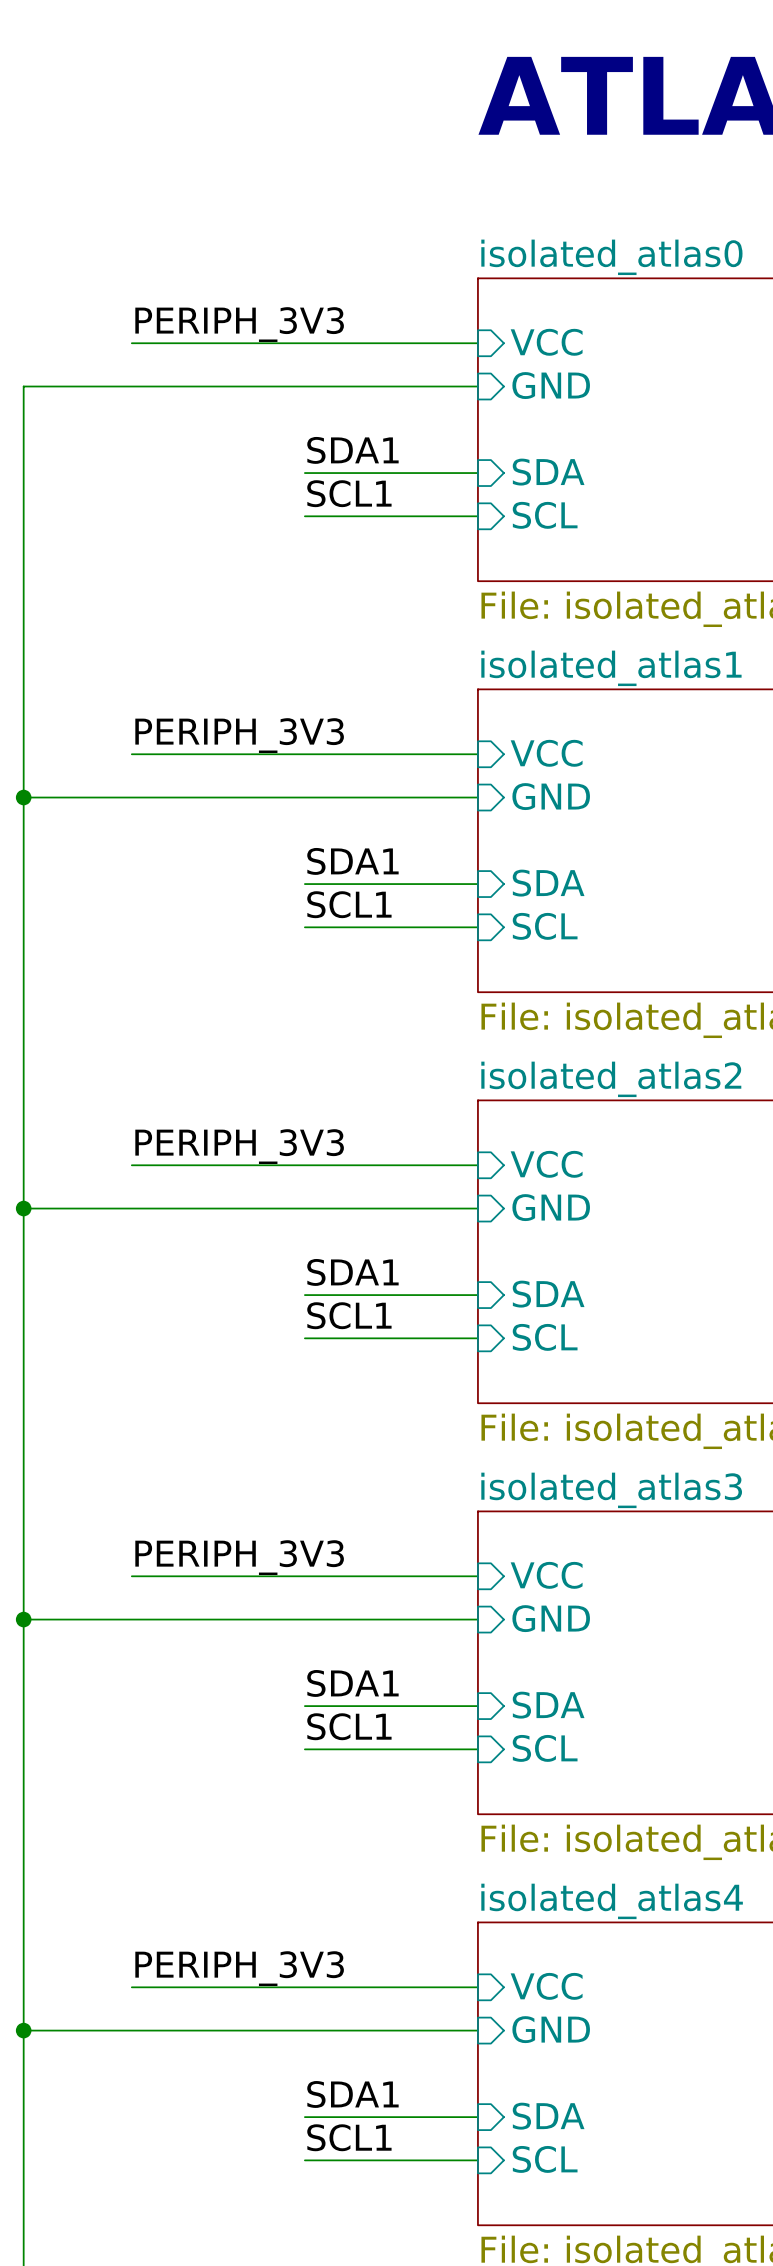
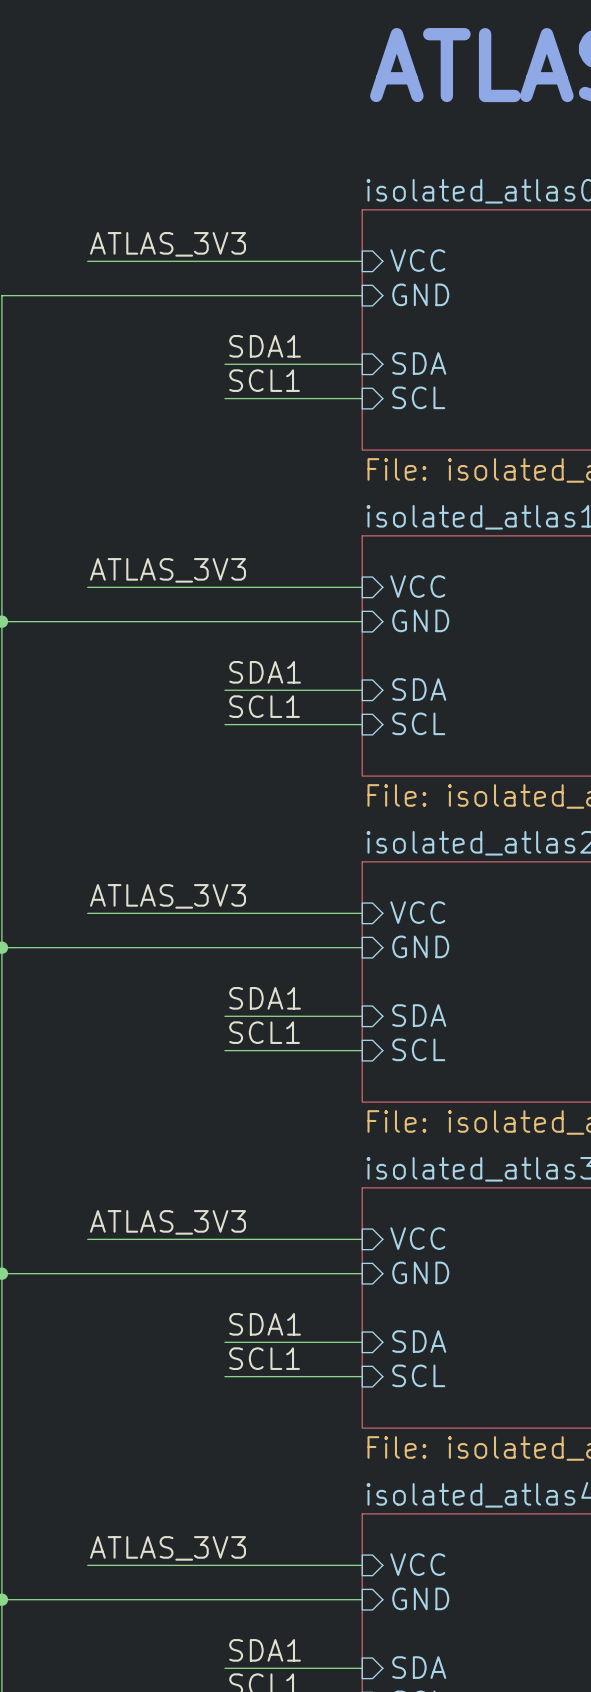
label: PERIPH_3V3 (239, 324) -> ATLAS_3V3 (168, 244)
label: PERIPH_3V3 (239, 735) -> ATLAS_3V3 (168, 570)
label: PERIPH_3V3 (239, 1146) -> ATLAS_3V3 (168, 896)
label: PERIPH_3V3 (239, 1557) -> ATLAS_3V3 (168, 1222)
label: PERIPH_3V3 (239, 1968) -> ATLAS_3V3 (168, 1548)

